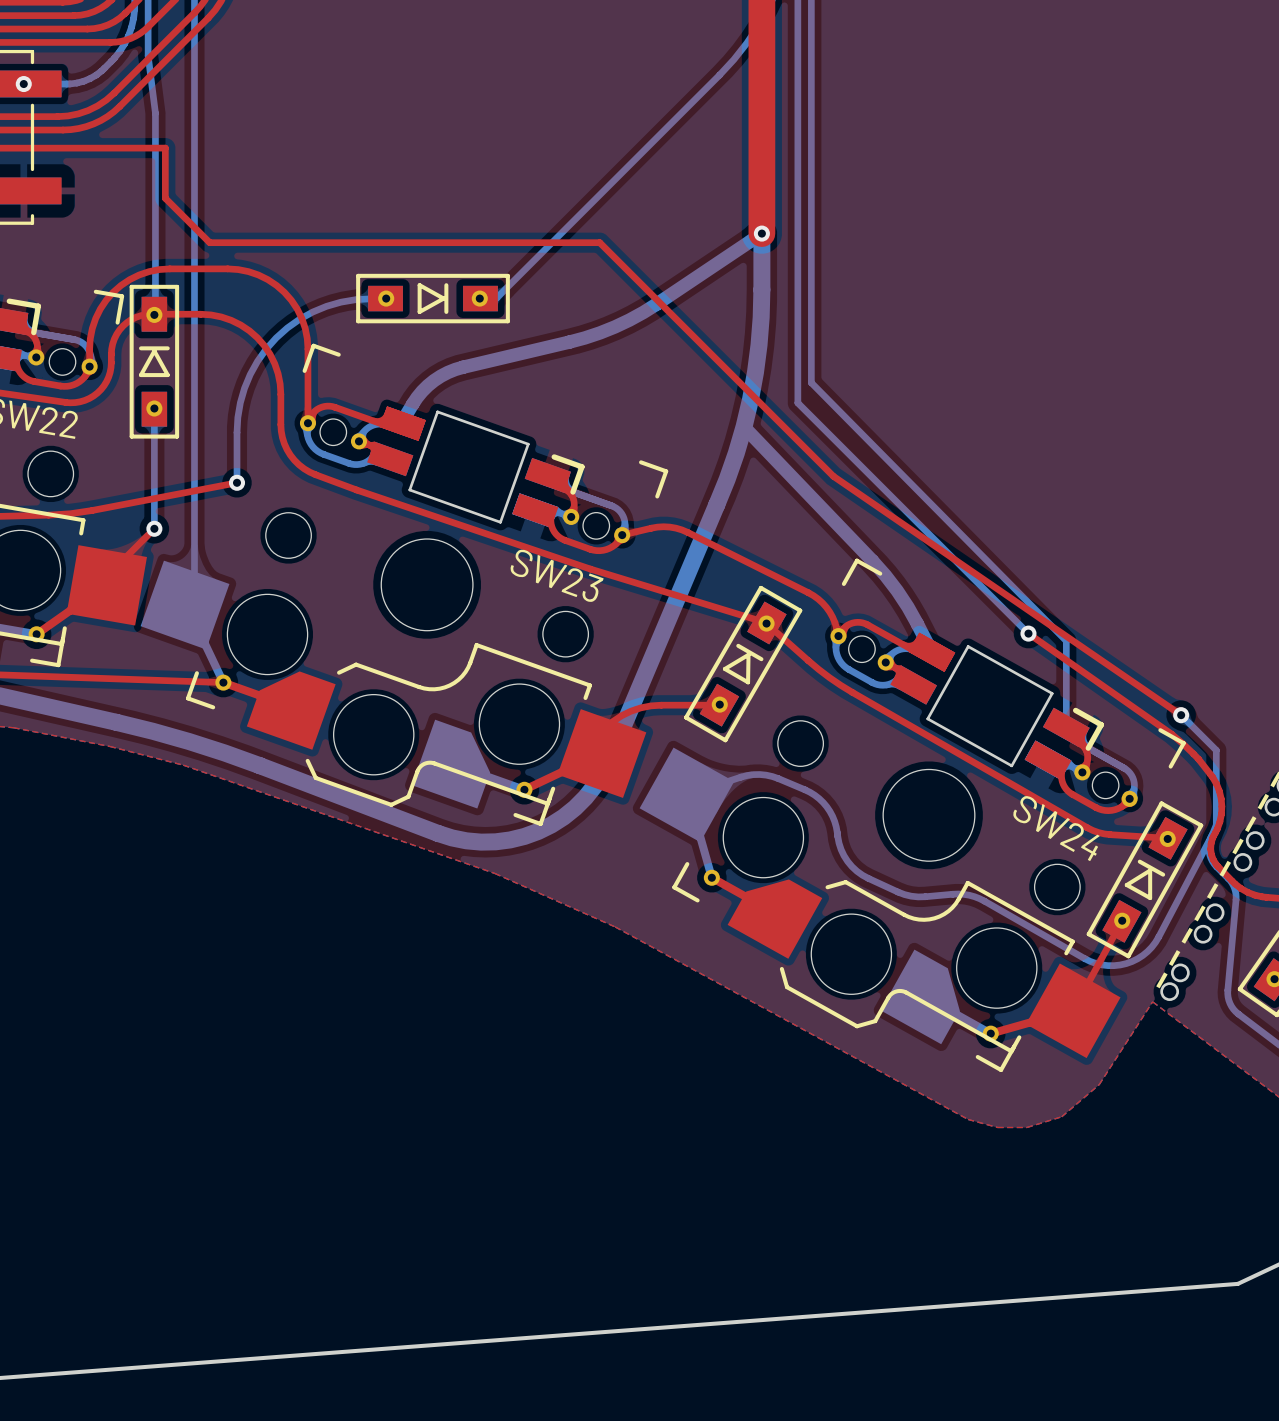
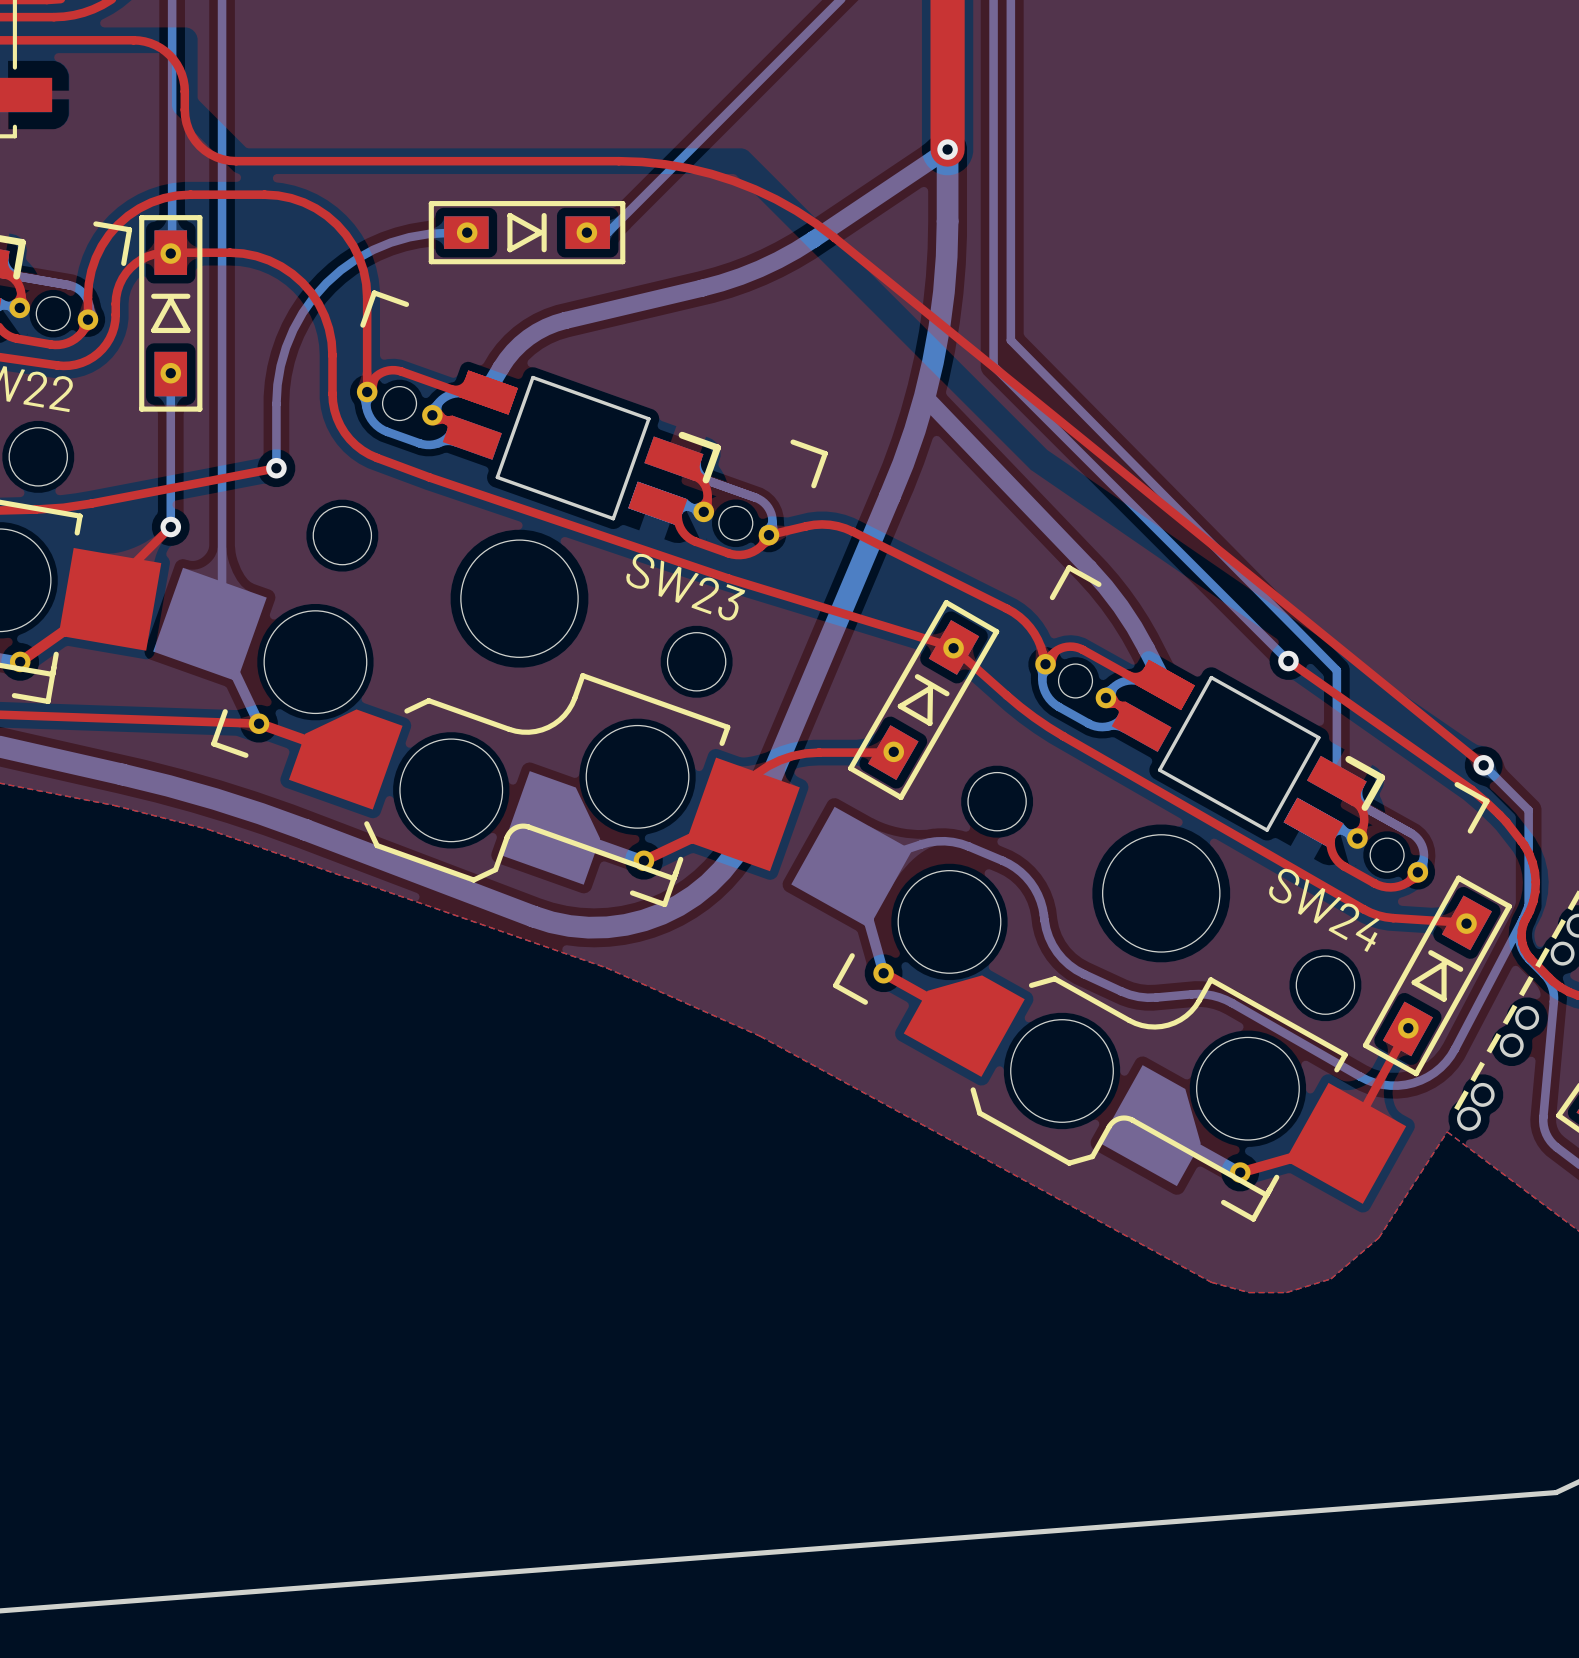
top track: (125, 148) (165, 148) (165, 188) -> (133, 40) (150, 43) (169, 55) (181, 74) (184, 91)
top track: (165, 198) (209, 242) -> (184, 104) (188, 129) (199, 146) (216, 157) (241, 161)
top track: (504, 242) (599, 242) (833, 476) (1181, 715) -> (618, 161) (665, 164) (688, 168) (733, 180) (776, 199) (815, 223) (1483, 765)

